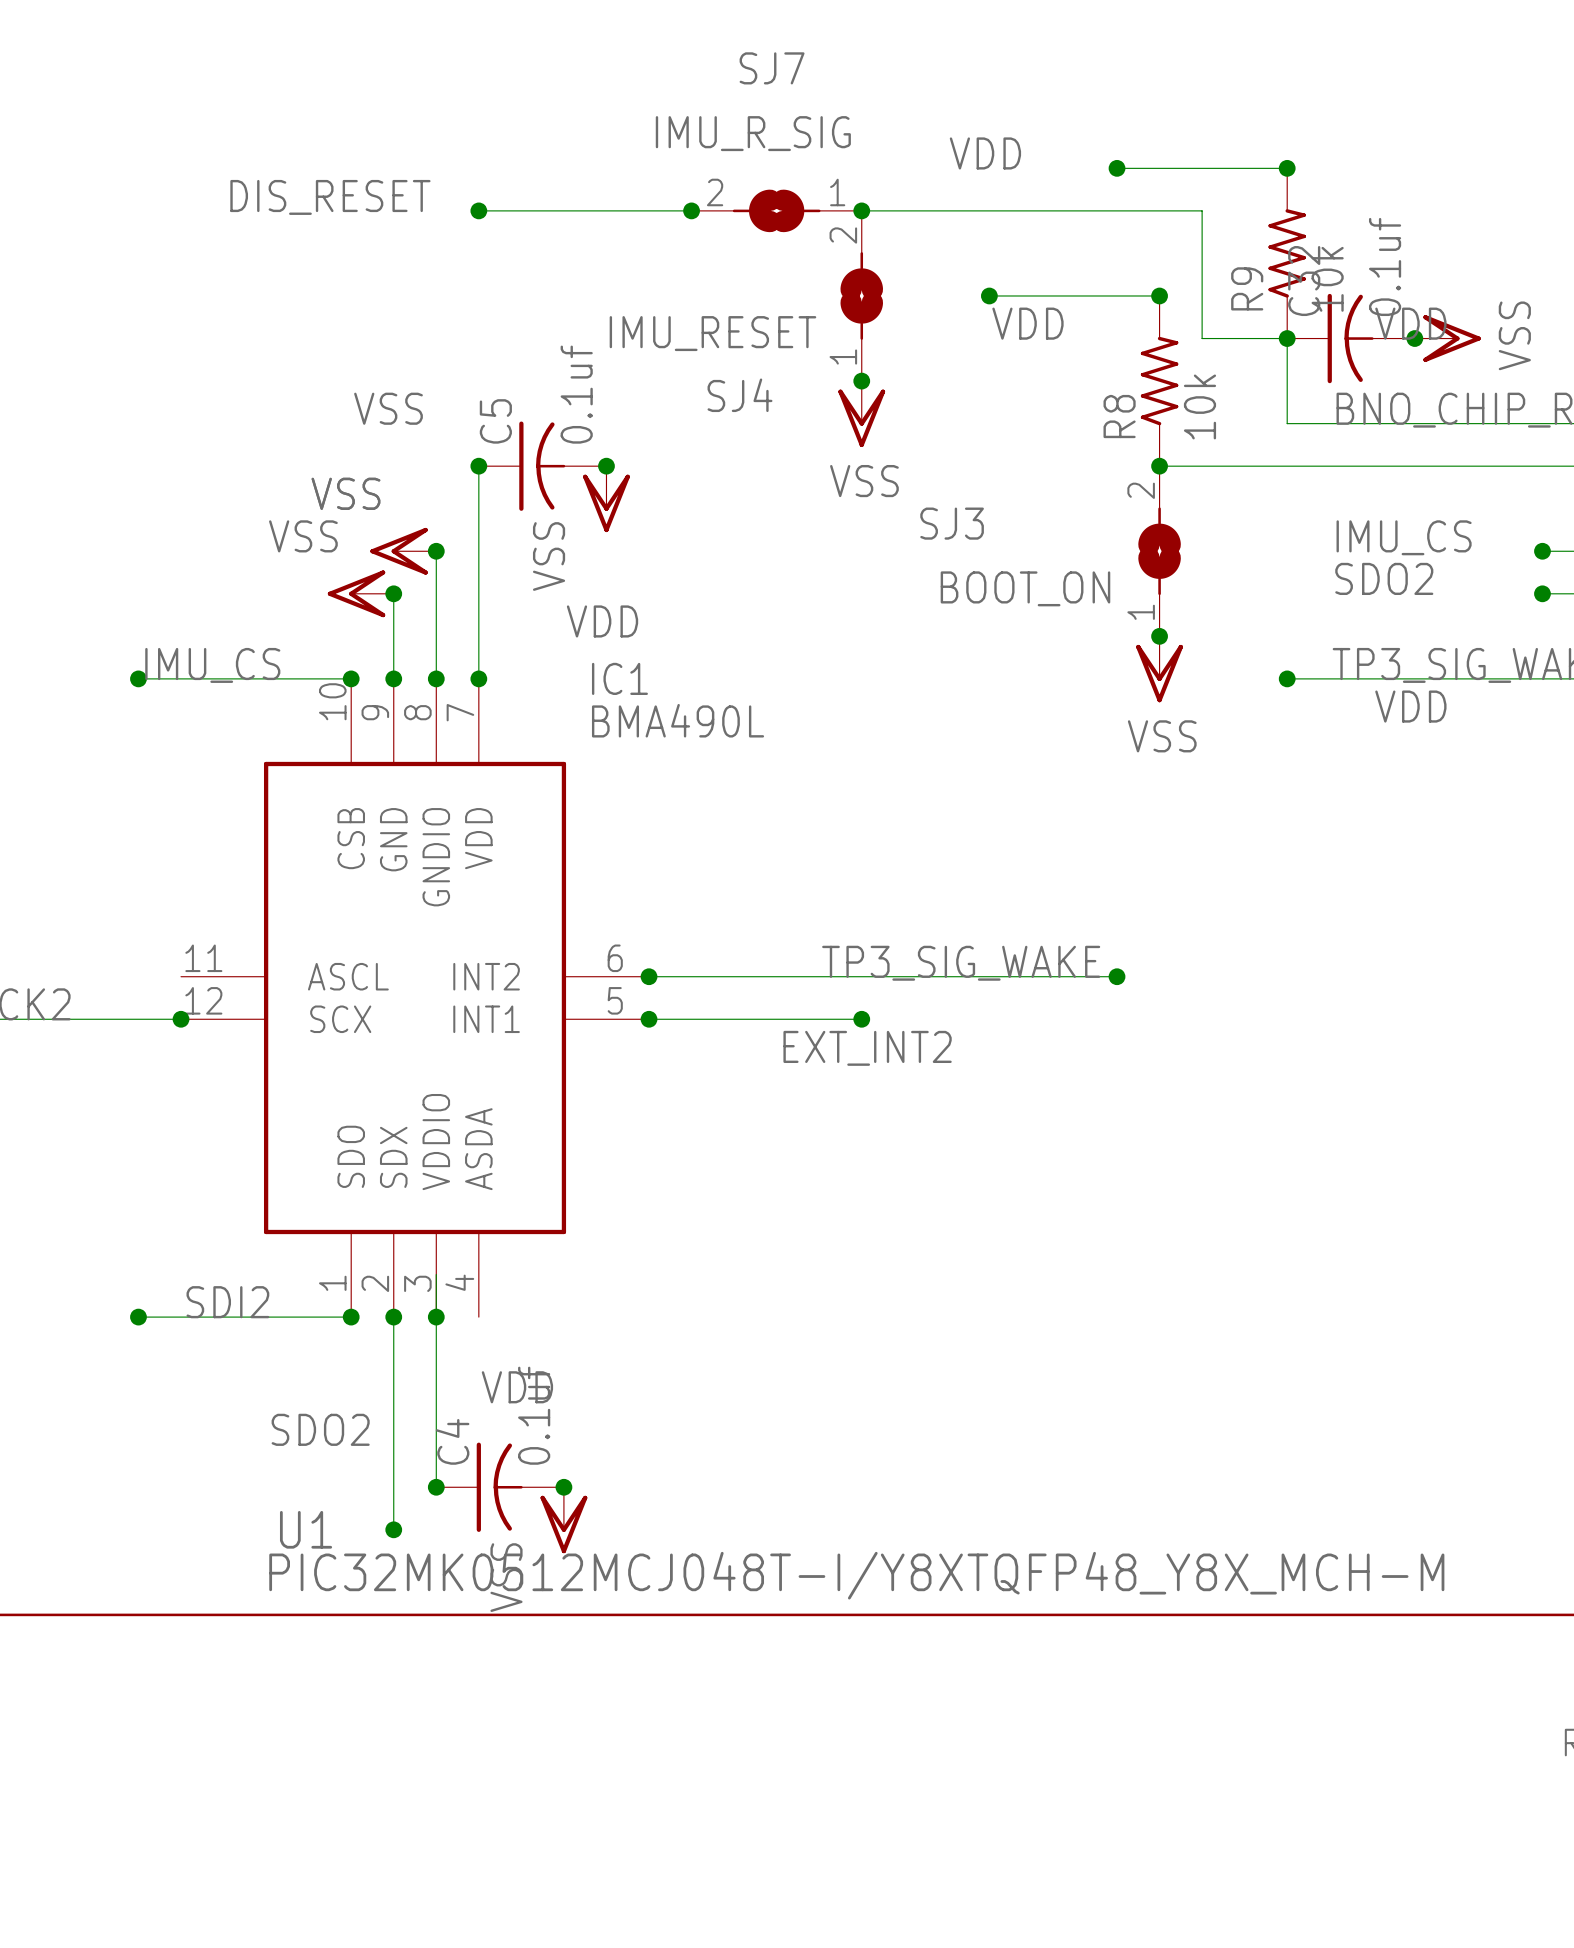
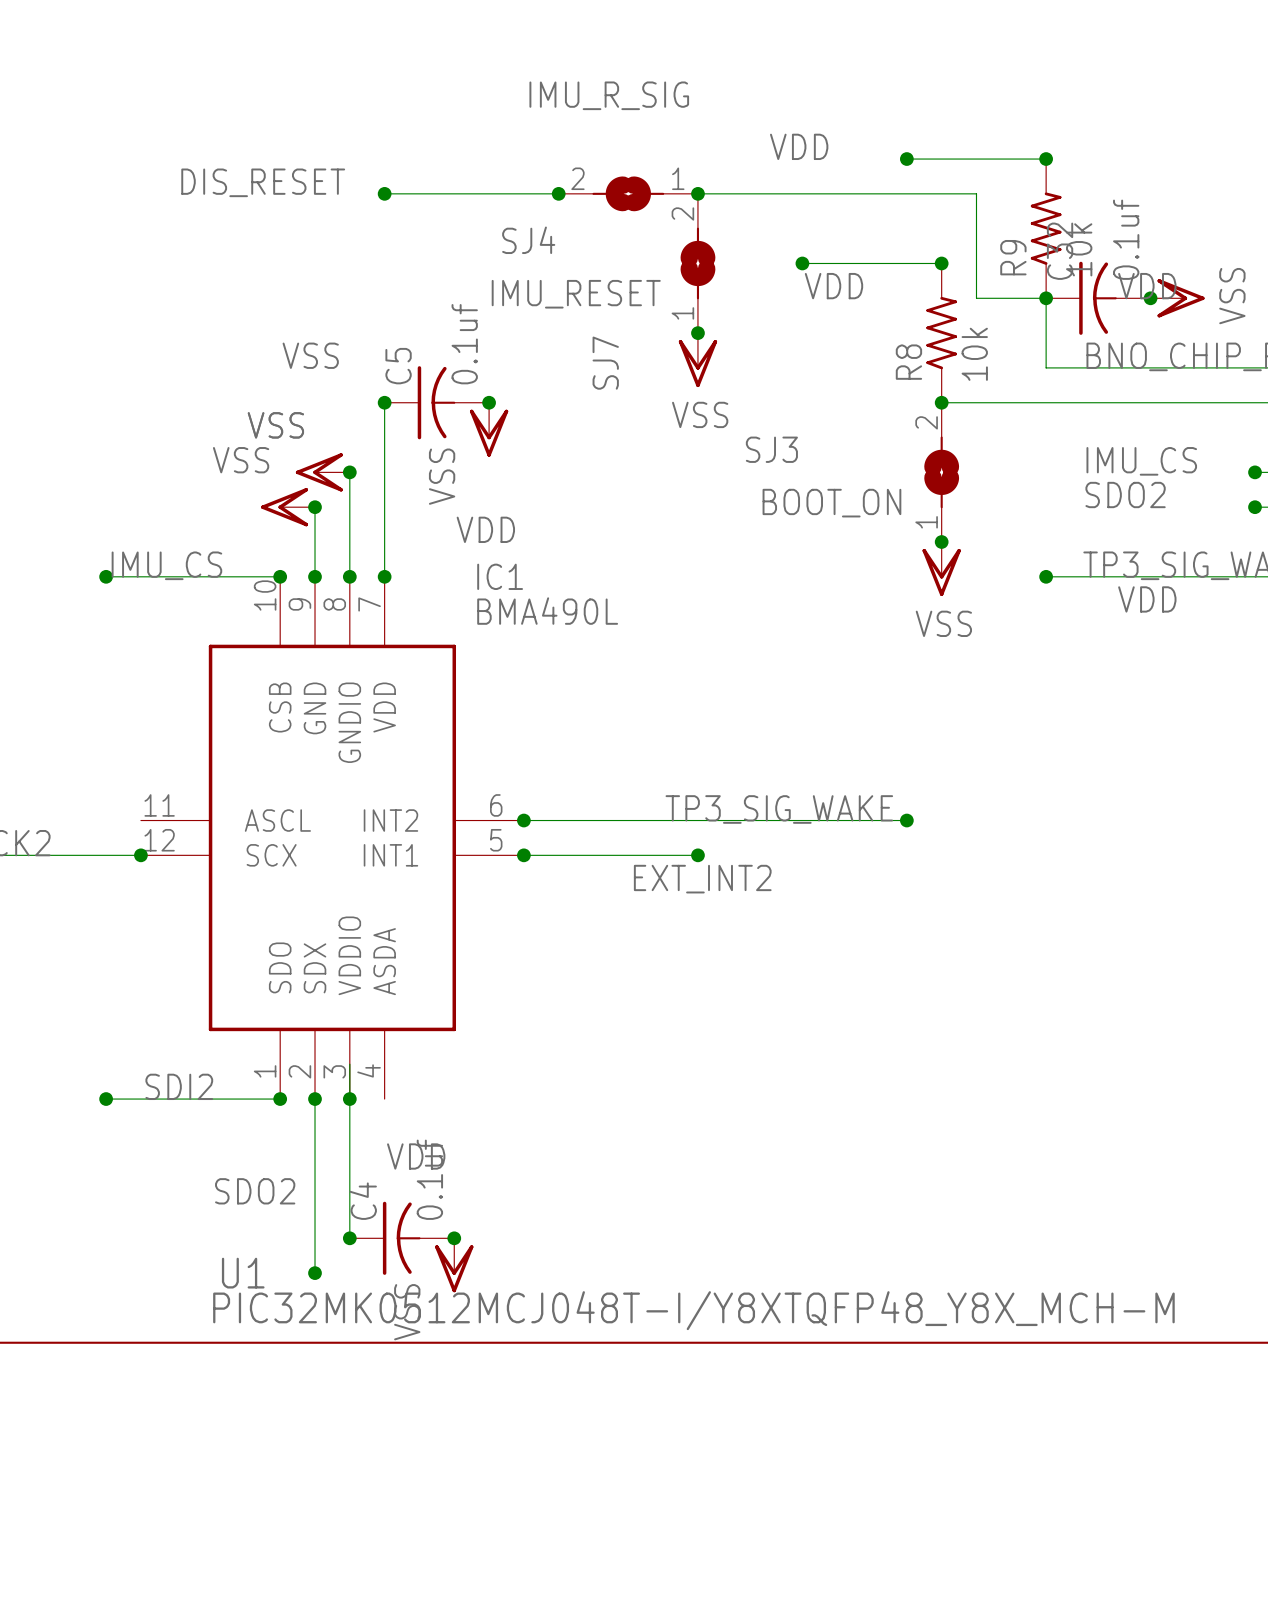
SJ7 name rotation: 0° (772, 68) -> 90° counterclockwise (605, 363)
SJ7 name position: SJ7 (772, 68) -> SJ7 (605, 363)
SJ7 value position: IMU_R_SIG (753, 133) -> IMU_R_SIG (609, 95)
SJ4 name position: SJ4 (739, 395) -> SJ4 (528, 240)

